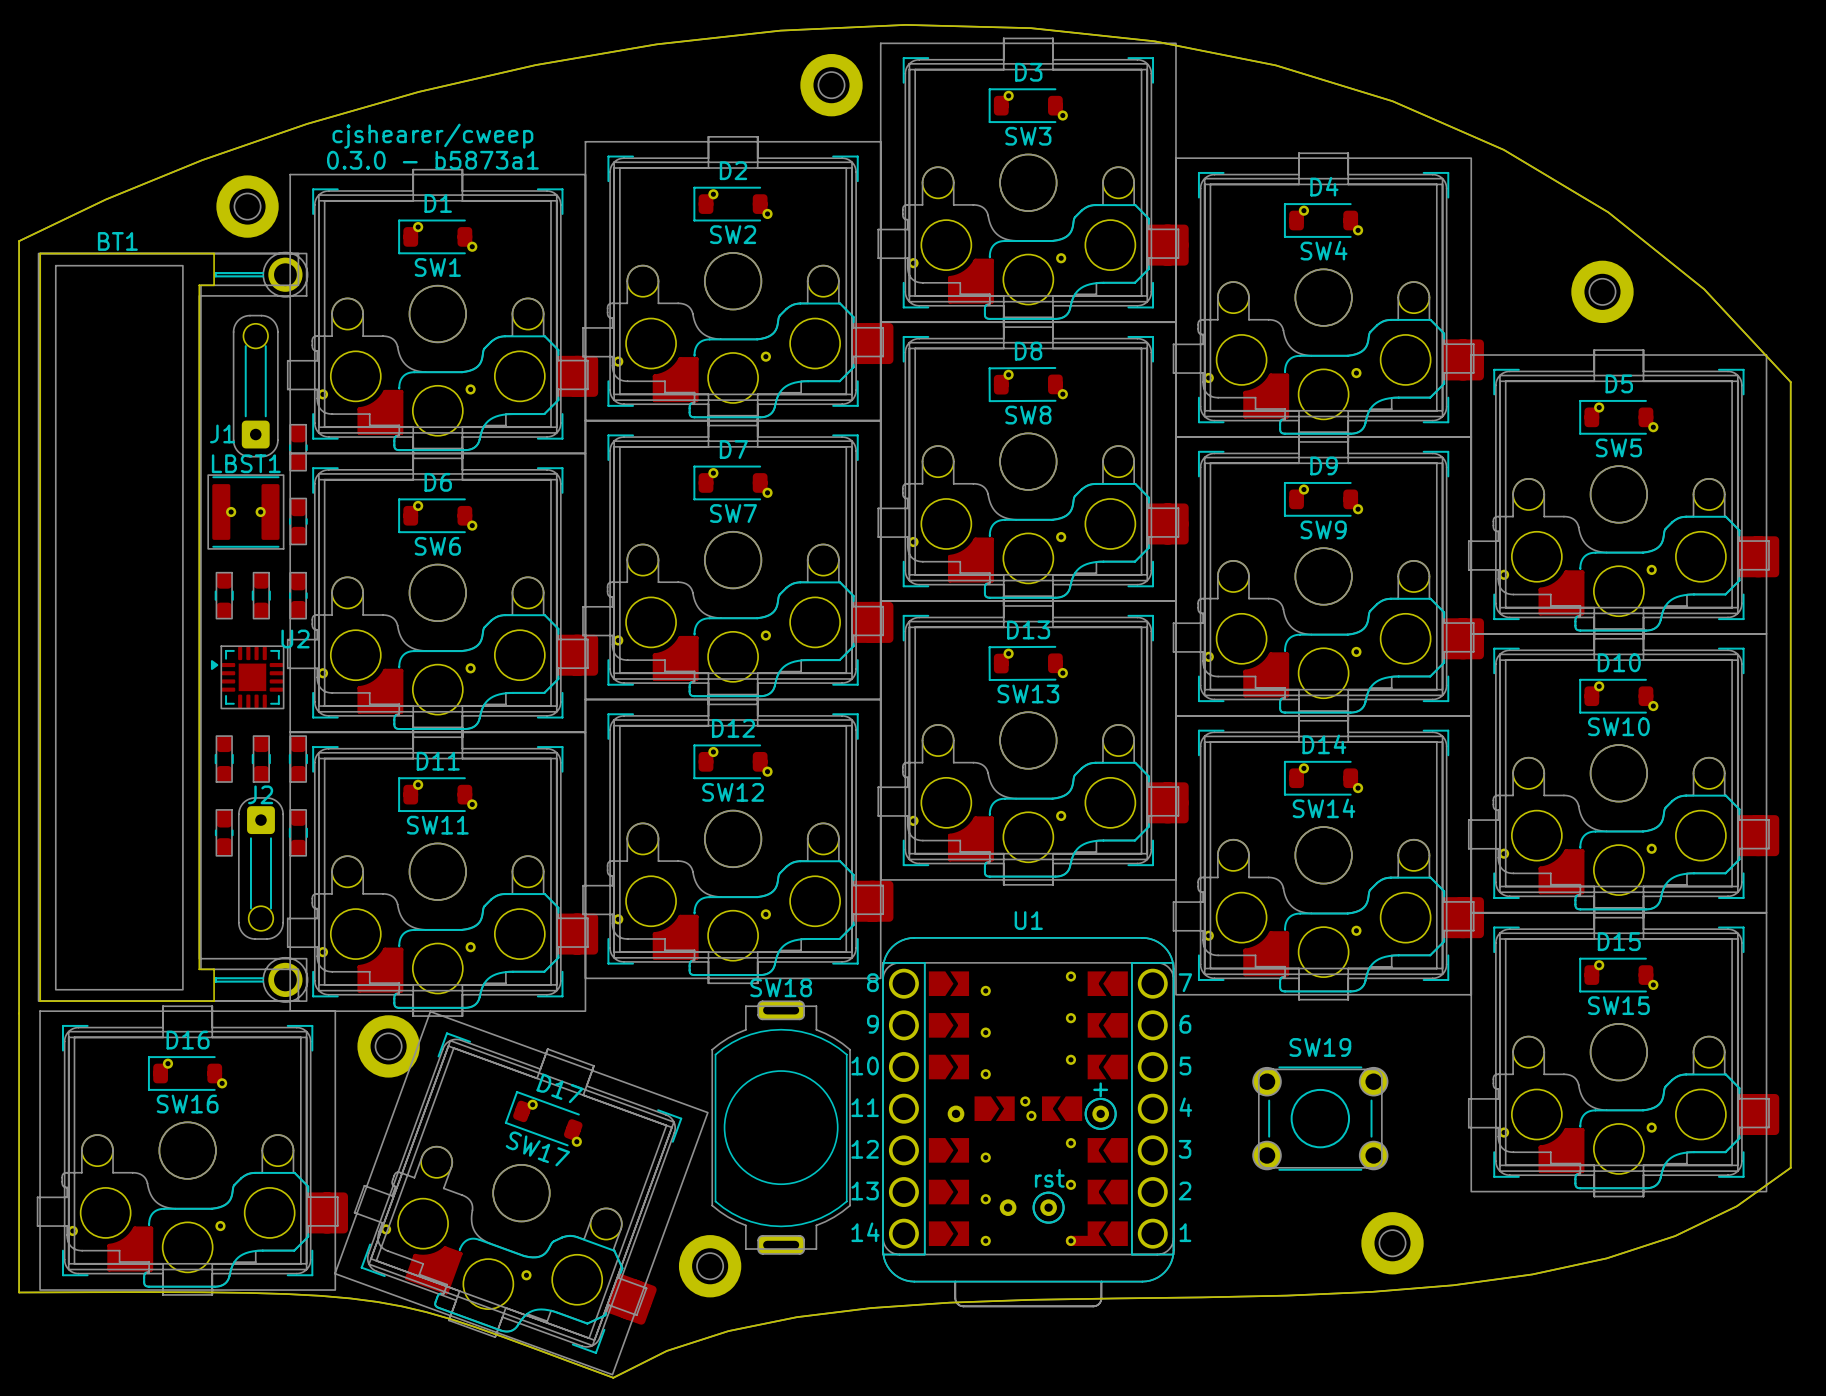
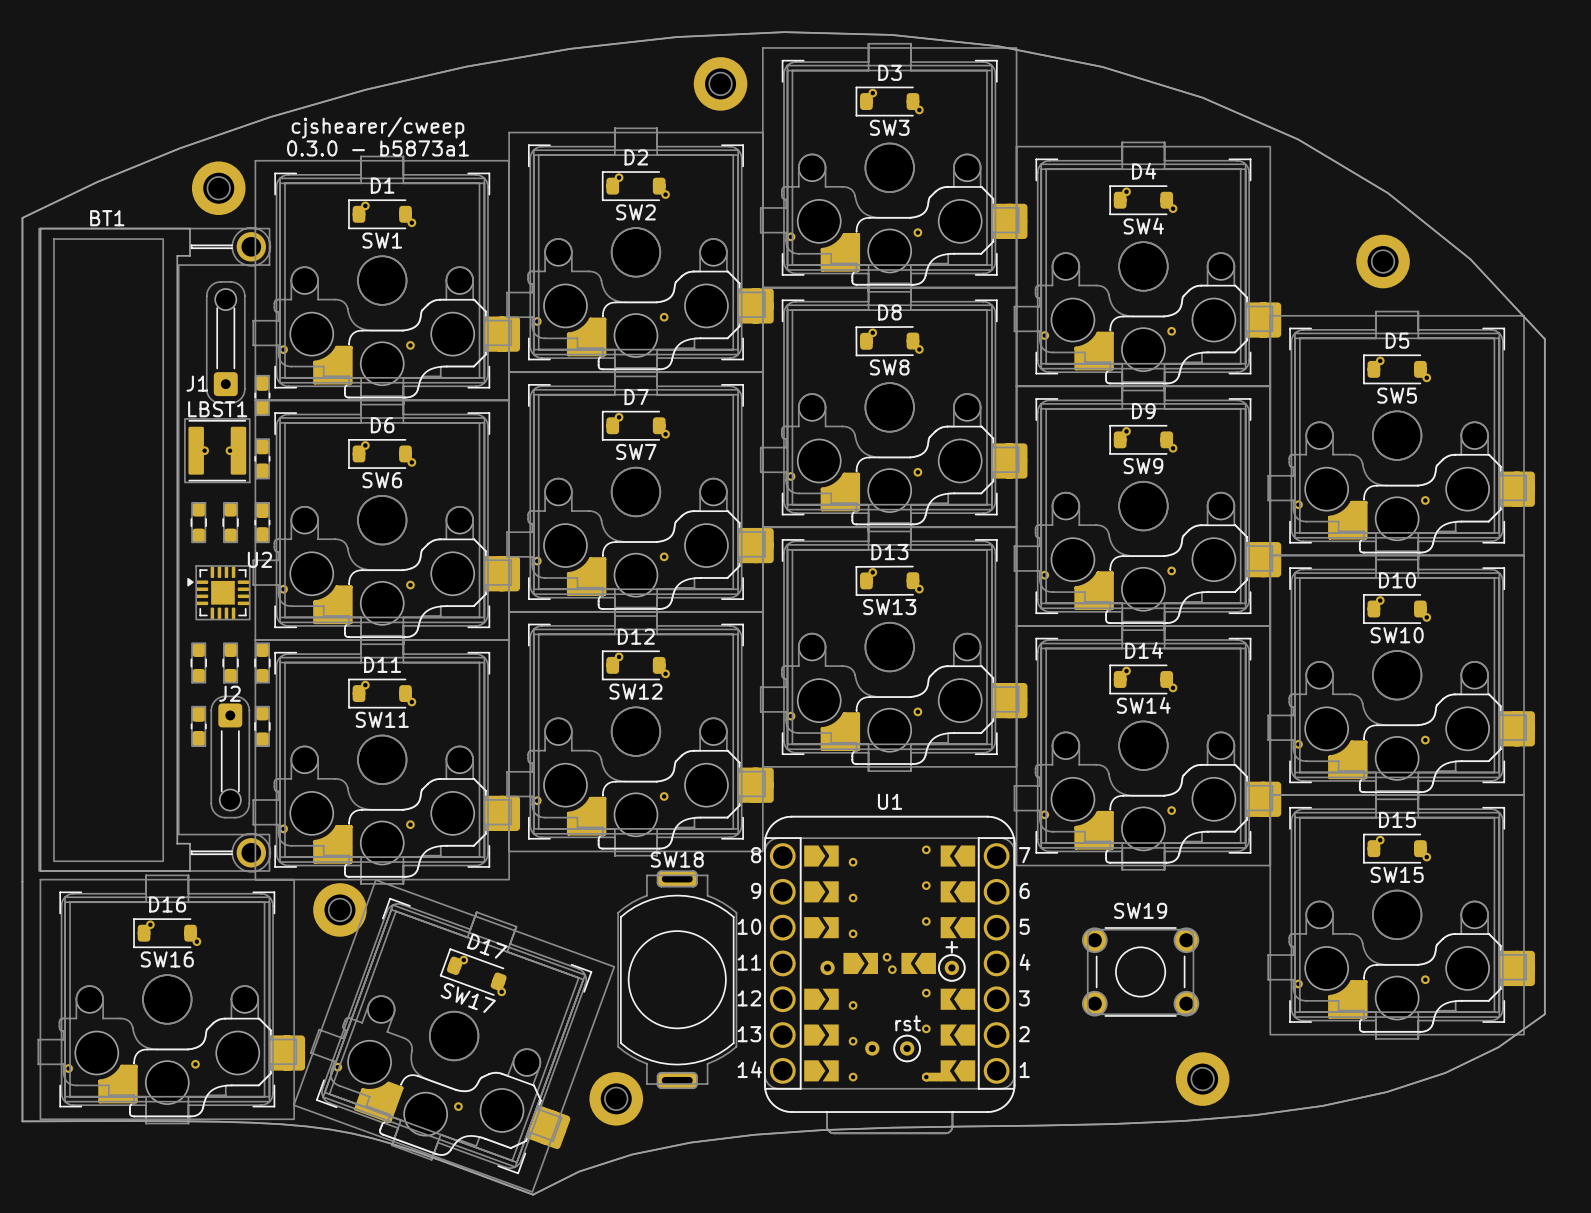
BT1 footprint: [37, 252, 308, 1003] -> [38, 227, 271, 873]

